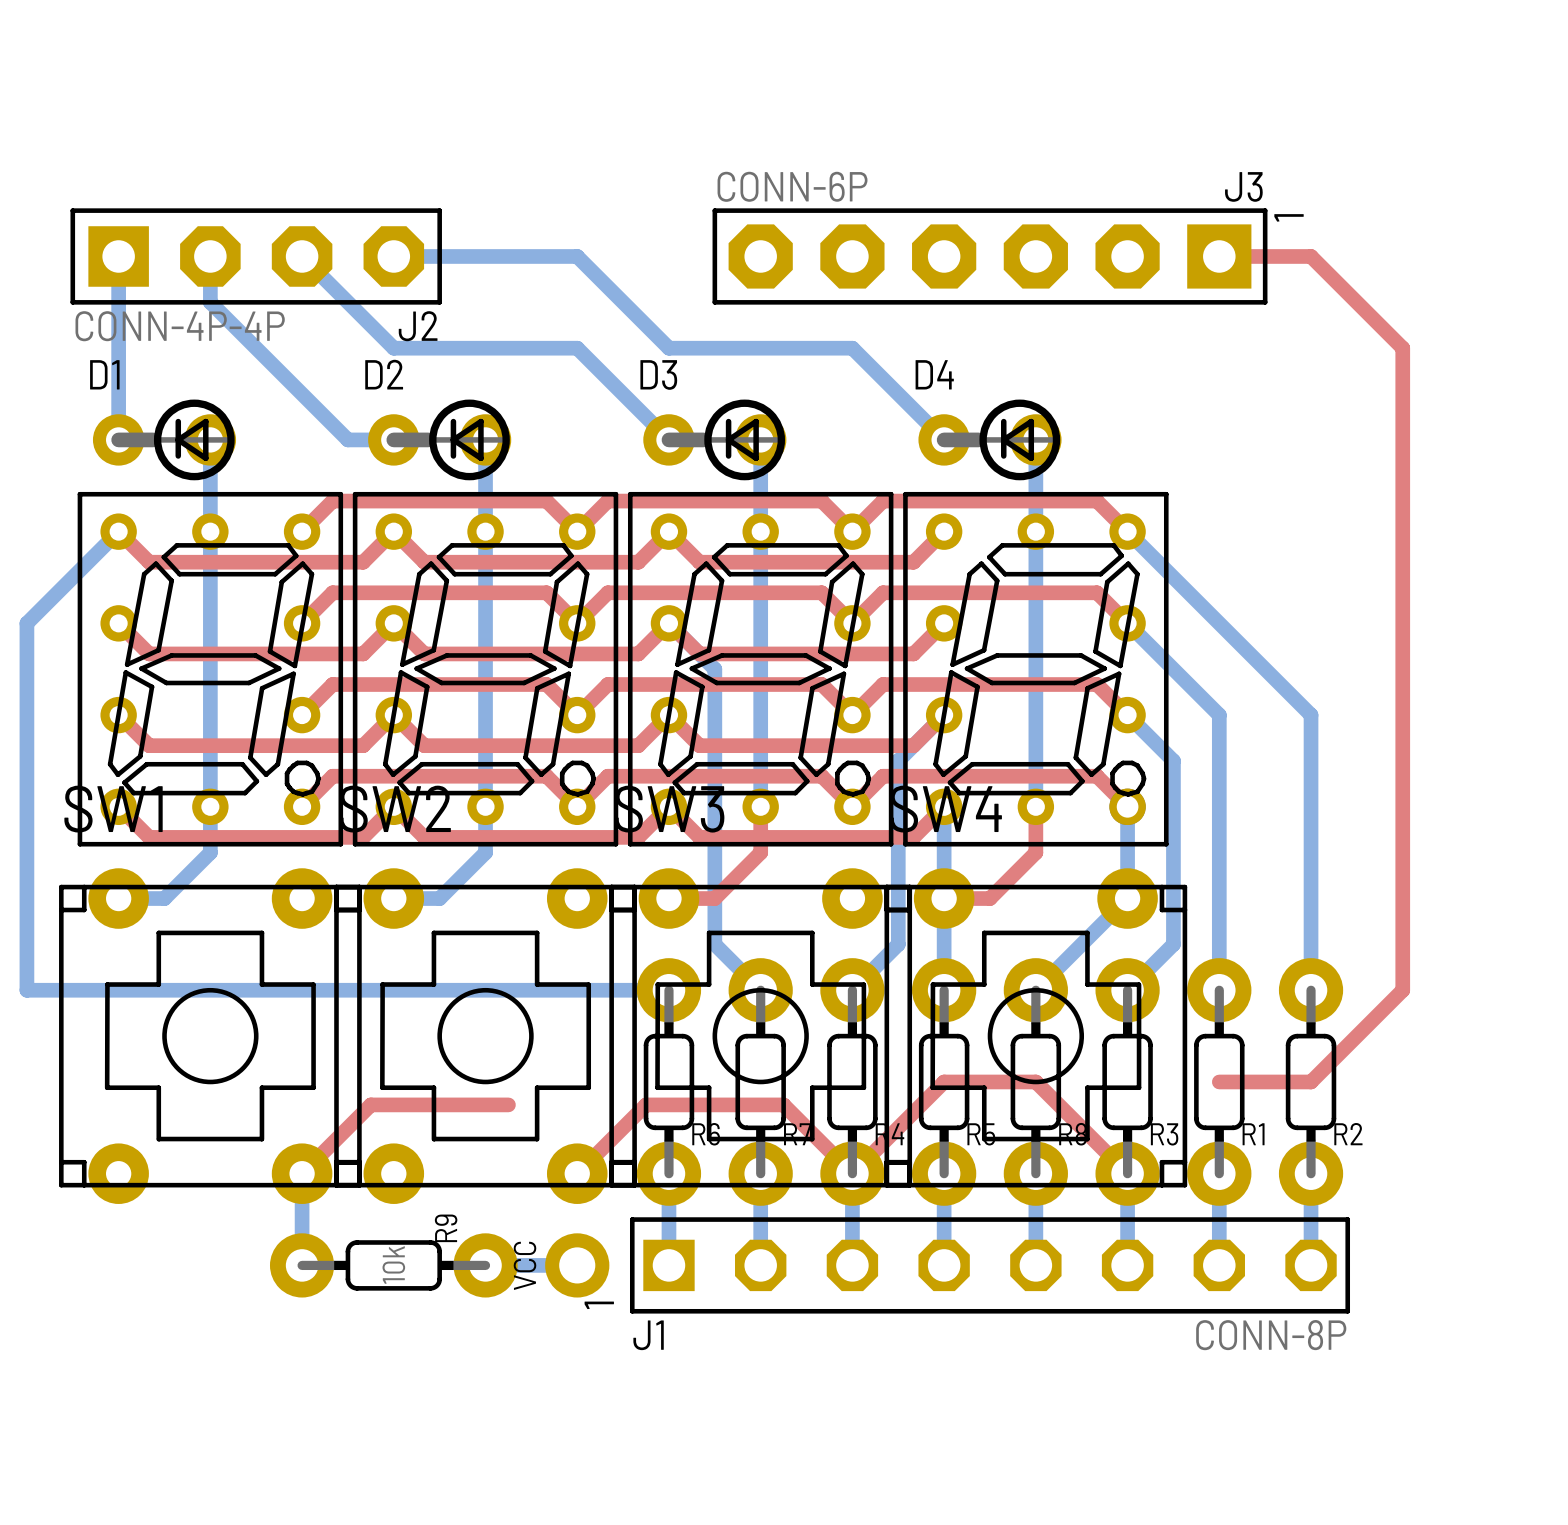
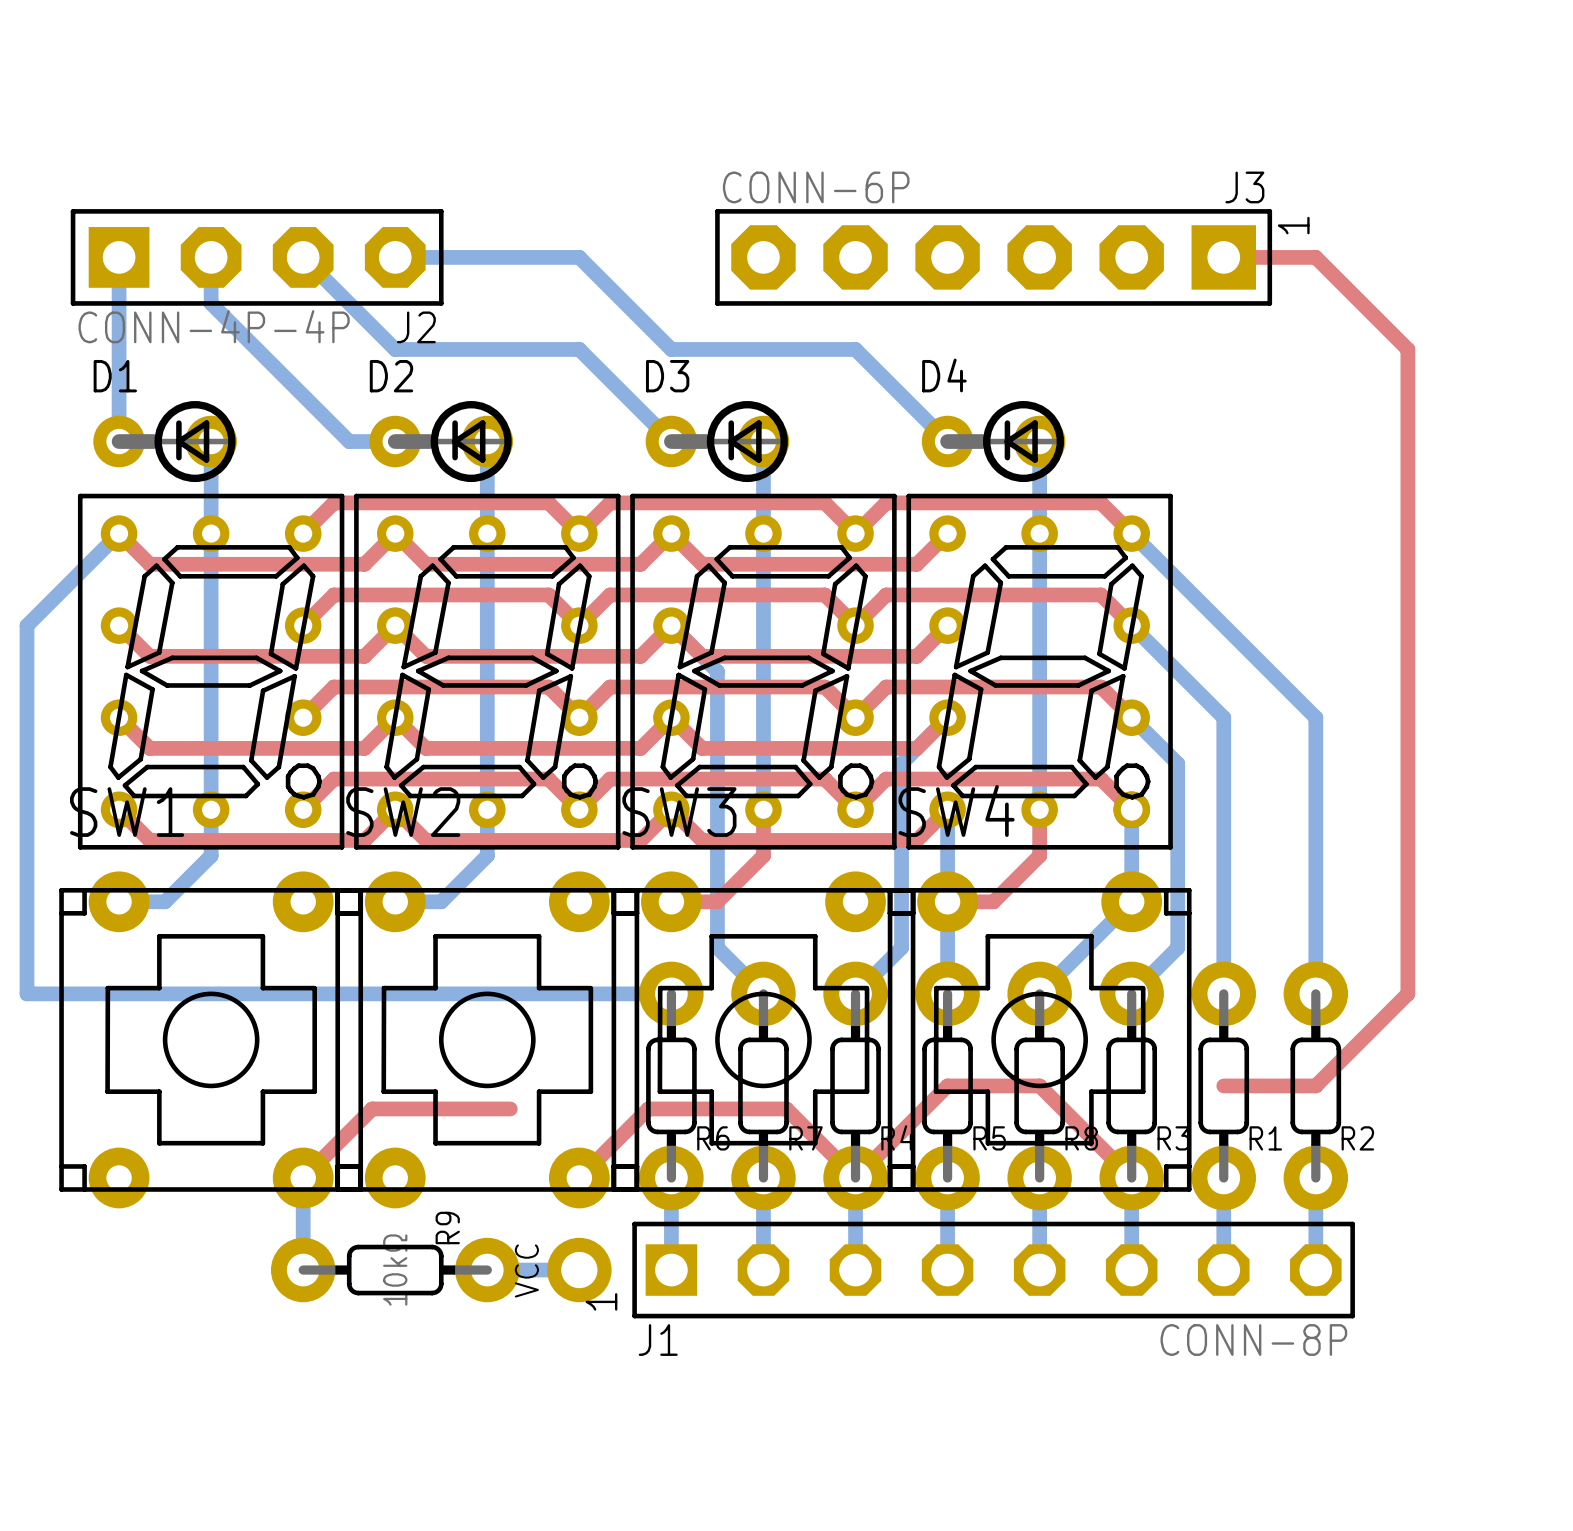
R9 value: 10k (393, 1265) -> 10kΩ (395, 1270)

